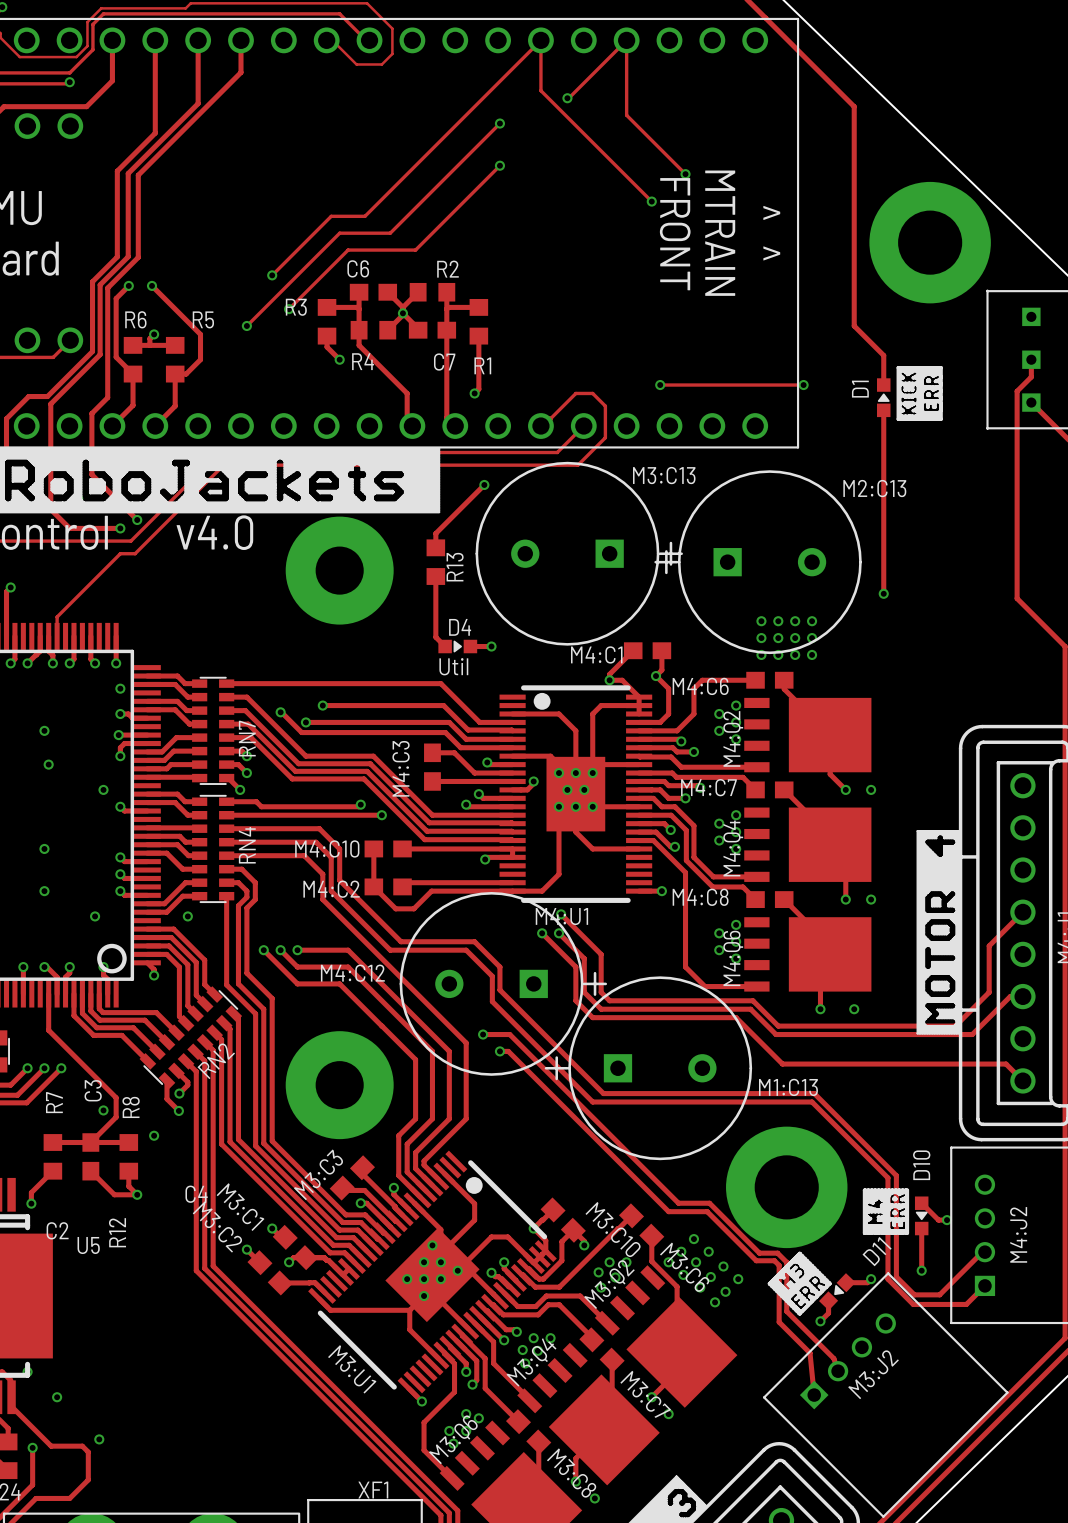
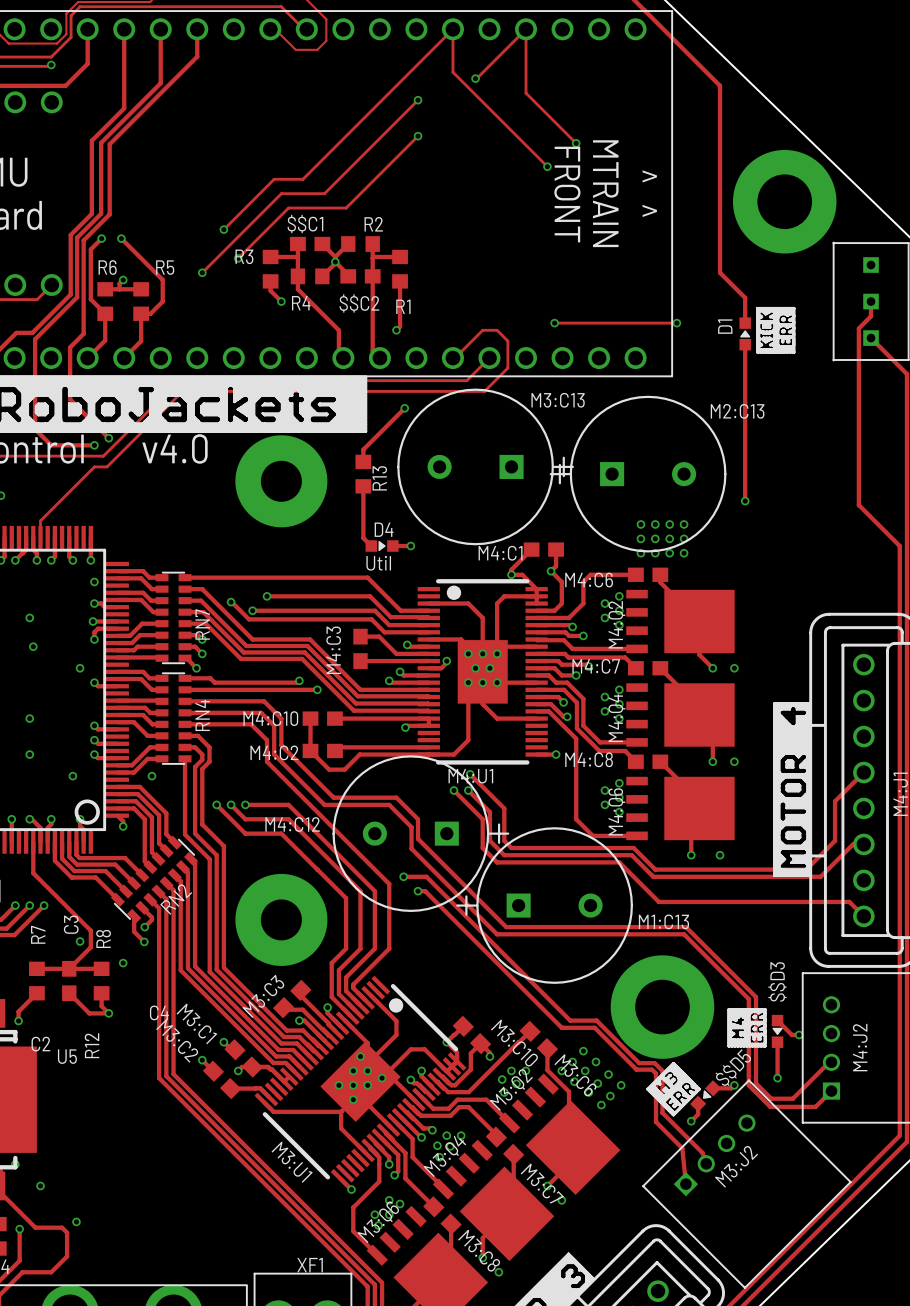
C6 name: C6 (358, 268) -> $$C1 (305, 224)
C7 name: C7 (444, 362) -> $$C2 (359, 303)
D10 name: D10 (921, 1165) -> $$D3 (777, 981)
D11 name: D11 (877, 1251) -> $$D5 (733, 1067)

